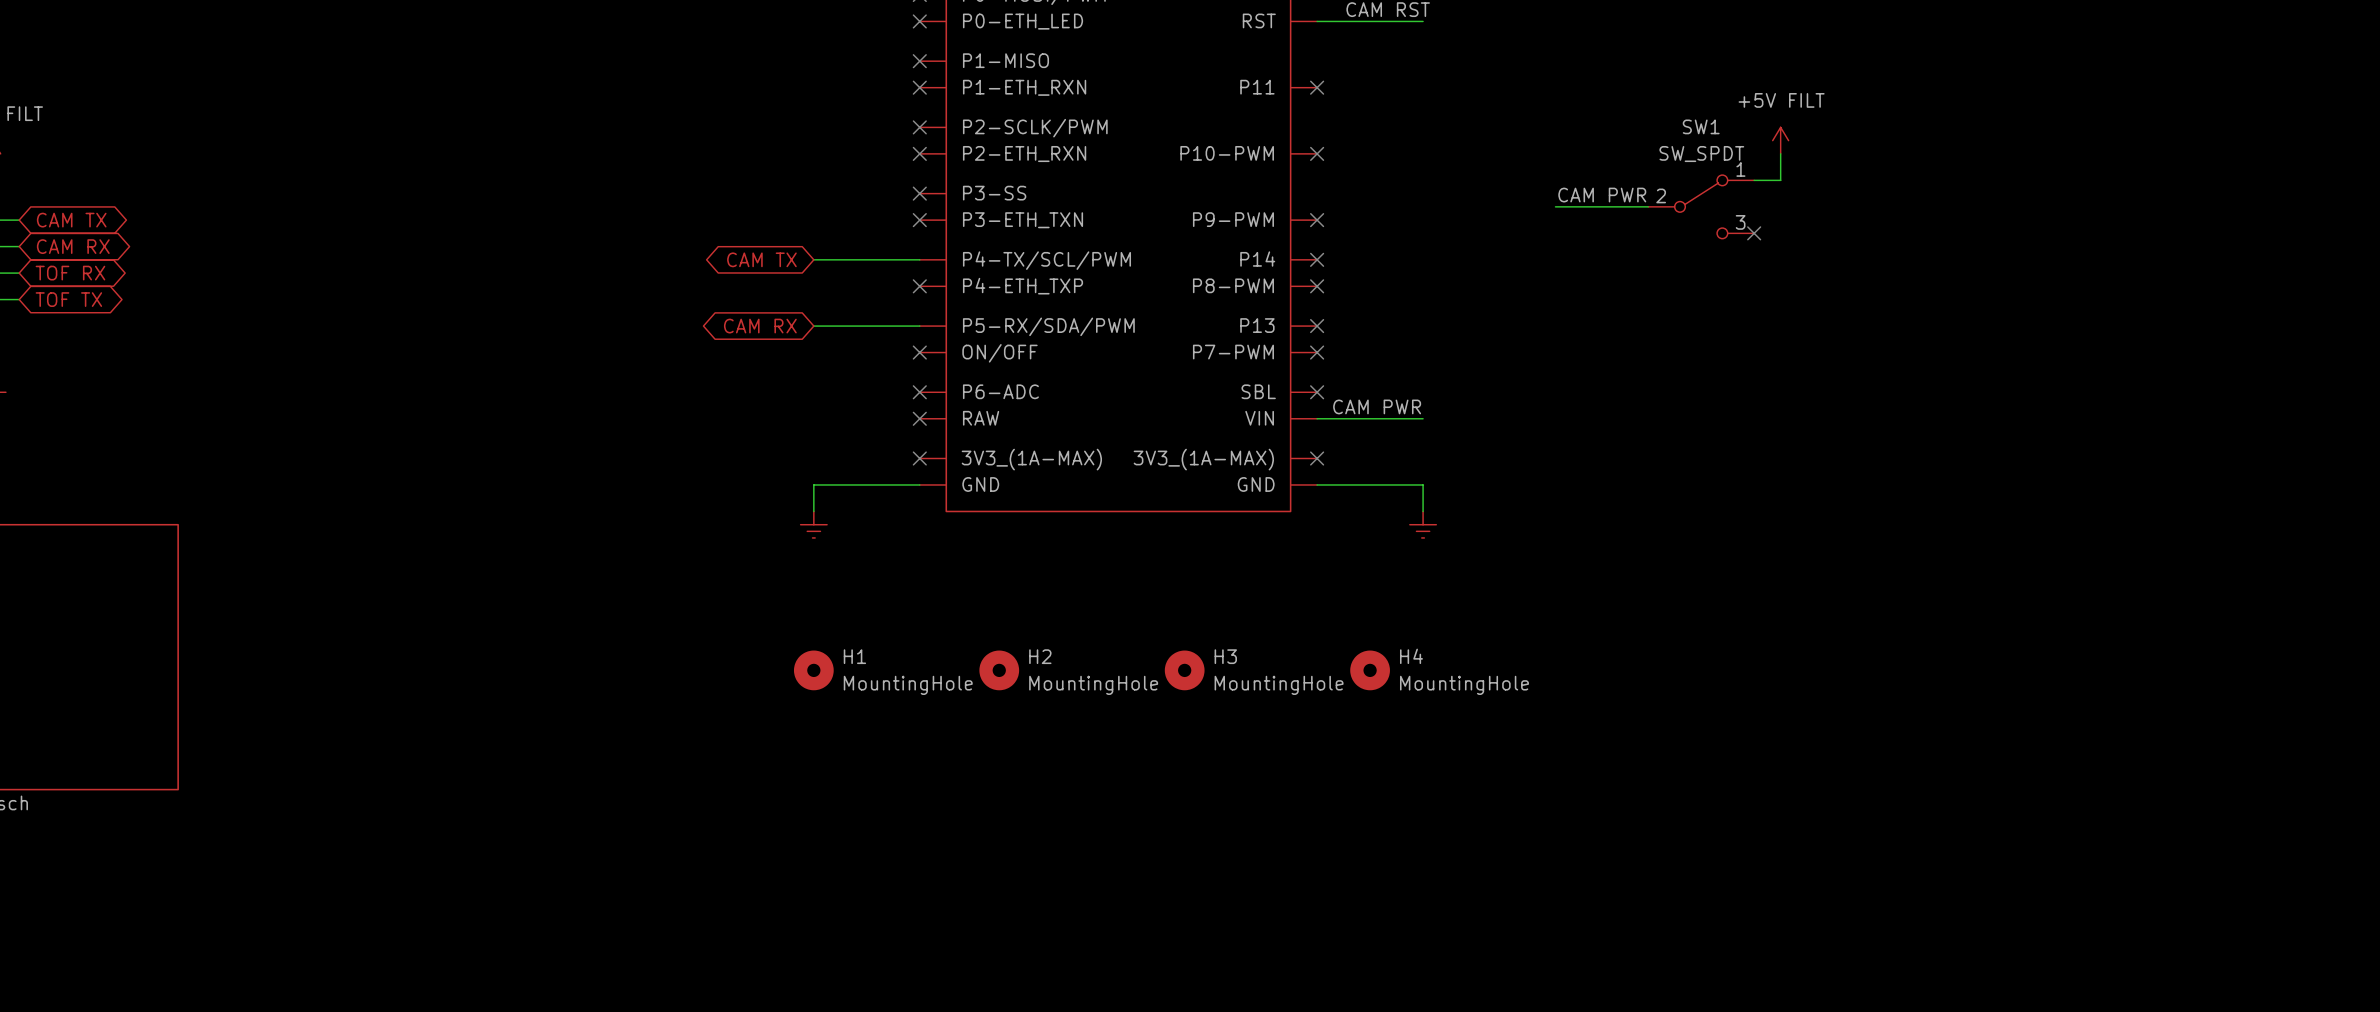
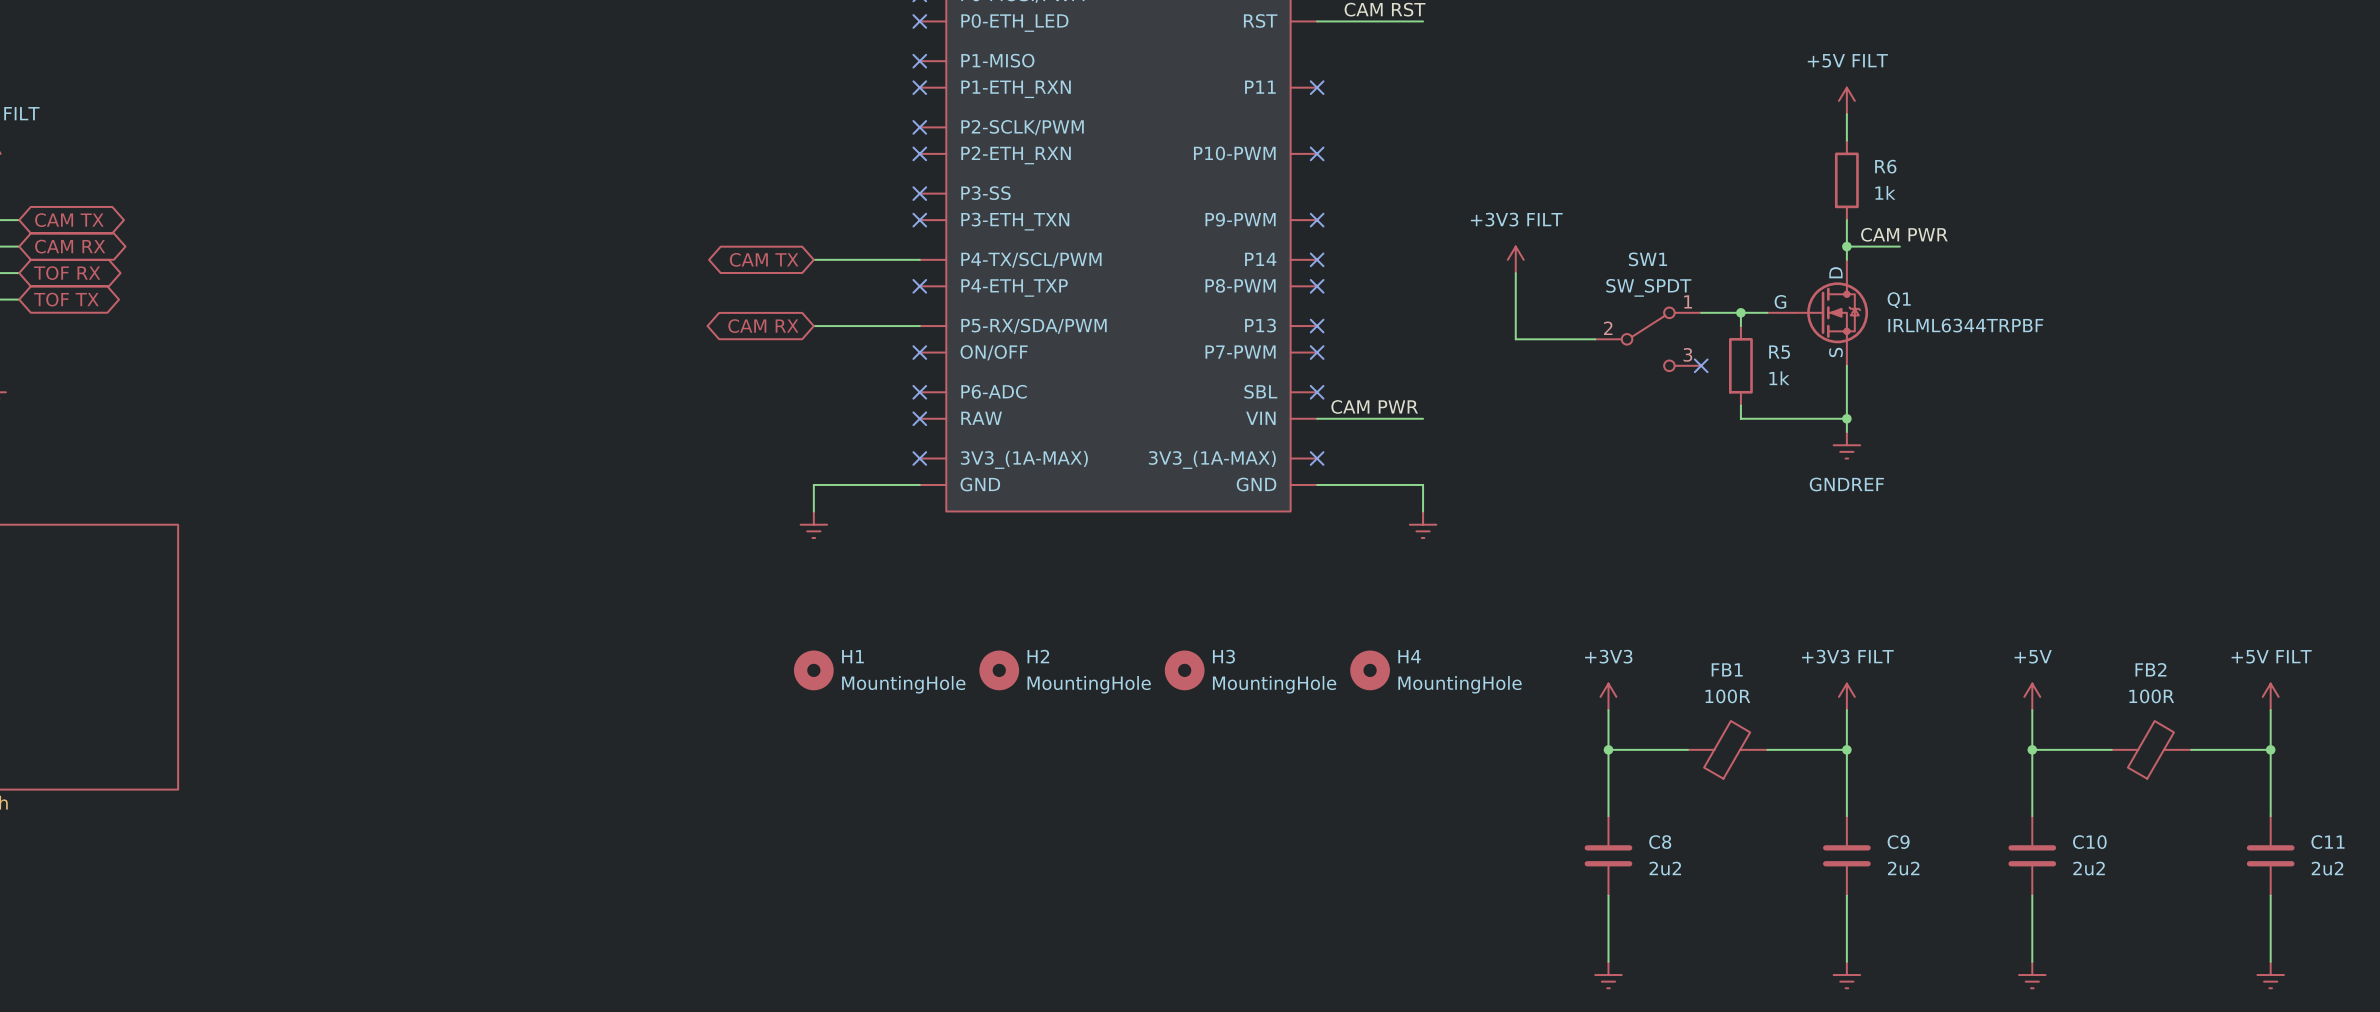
wire: none -> (1846, 114) (1846, 140)
power symbol position: +5V FILT (1780, 140) -> +5V FILT (1846, 100)
wire: (1780, 153) (1780, 180) (1754, 180) -> none
R6: none -> 1k (1846, 180)
label: CAM PWR (1602, 195) -> none
wire: (1555, 206) (1648, 206) -> none
SW1 position: (1701, 206) -> (1648, 339)
wire: none -> (1846, 220) (1846, 259)
no-connect mark: (1754, 233) -> none
label: none -> CAM PWR (1904, 234)
wire: none -> (1846, 246) (1899, 246)
junction: none -> (1846, 246)
power symbol: none -> +3V3 FILT (1515, 259)
wire: none -> (1515, 273) (1515, 339) (1595, 339)
wire: none -> (1701, 312) (1767, 312)
wire: none -> (1740, 312) (1740, 326)
junction: none -> (1740, 312)
Q1: none -> IRLML6344TRPBF (1817, 312)
no-connect mark: none -> (1701, 365)
R5: none -> 1k (1740, 365)
wire: none -> (1846, 365) (1846, 432)
wire: none -> (1740, 405) (1740, 418) (1846, 418)
junction: none -> (1846, 418)
power symbol: none -> GNDREF (1846, 445)
power symbol: none -> +3V3 (1608, 696)
power symbol: none -> +3V3 FILT (1846, 696)
power symbol: none -> +5V (2032, 696)
power symbol: none -> +5V FILT (2270, 696)
wire: none -> (1608, 710) (1608, 816)
wire: none -> (1846, 710) (1846, 816)
wire: none -> (2032, 710) (2032, 816)
wire: none -> (2270, 710) (2270, 816)
wire: none -> (1608, 749) (1687, 749)
junction: none -> (1608, 749)
FB1: none -> 100R (1727, 749)
wire: none -> (1767, 749) (1846, 749)
junction: none -> (1846, 749)
wire: none -> (2032, 749) (2111, 749)
junction: none -> (2032, 749)
FB2: none -> 100R (2151, 749)
wire: none -> (2191, 749) (2270, 749)
junction: none -> (2270, 749)
C8: none -> 2u2 (1608, 855)
C9: none -> 2u2 (1846, 855)
C10: none -> 2u2 (2032, 855)
C11: none -> 2u2 (2270, 855)
wire: none -> (1608, 895) (1608, 961)
wire: none -> (1846, 895) (1846, 961)
wire: none -> (2032, 895) (2032, 961)
wire: none -> (2270, 895) (2270, 961)
power symbol: none -> (1608, 975)
power symbol: none -> (1846, 975)
power symbol: none -> (2032, 975)
power symbol: none -> (2270, 975)

